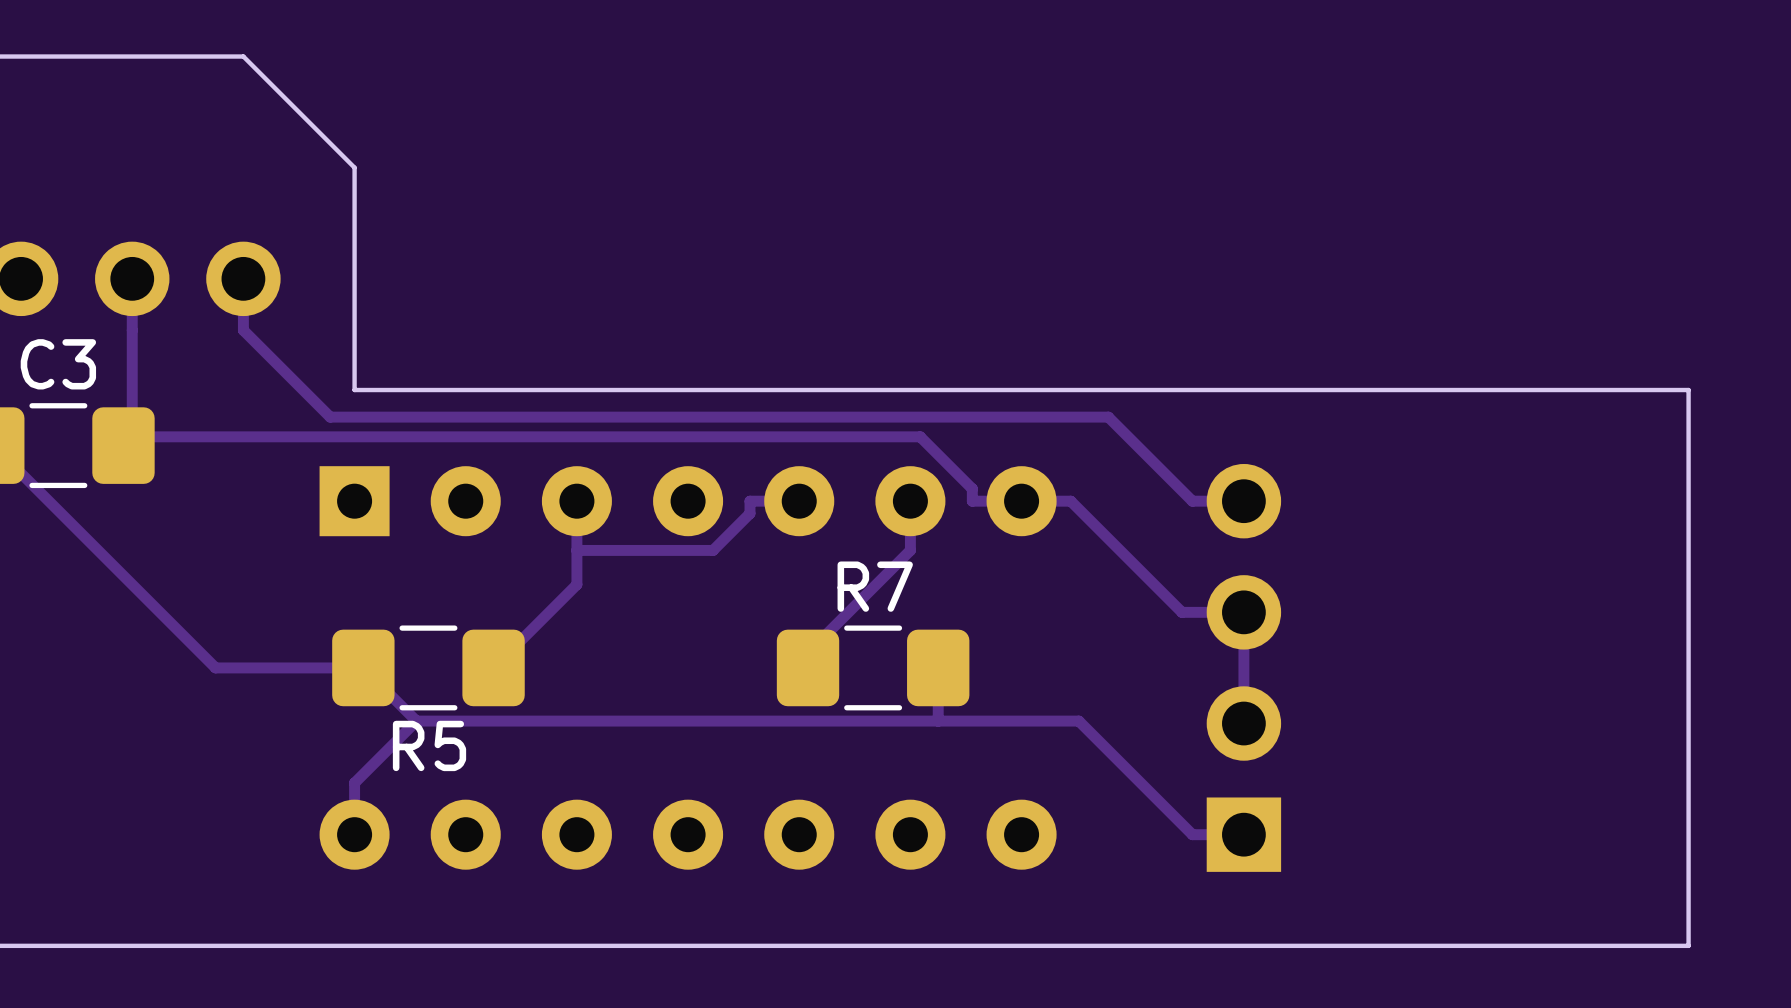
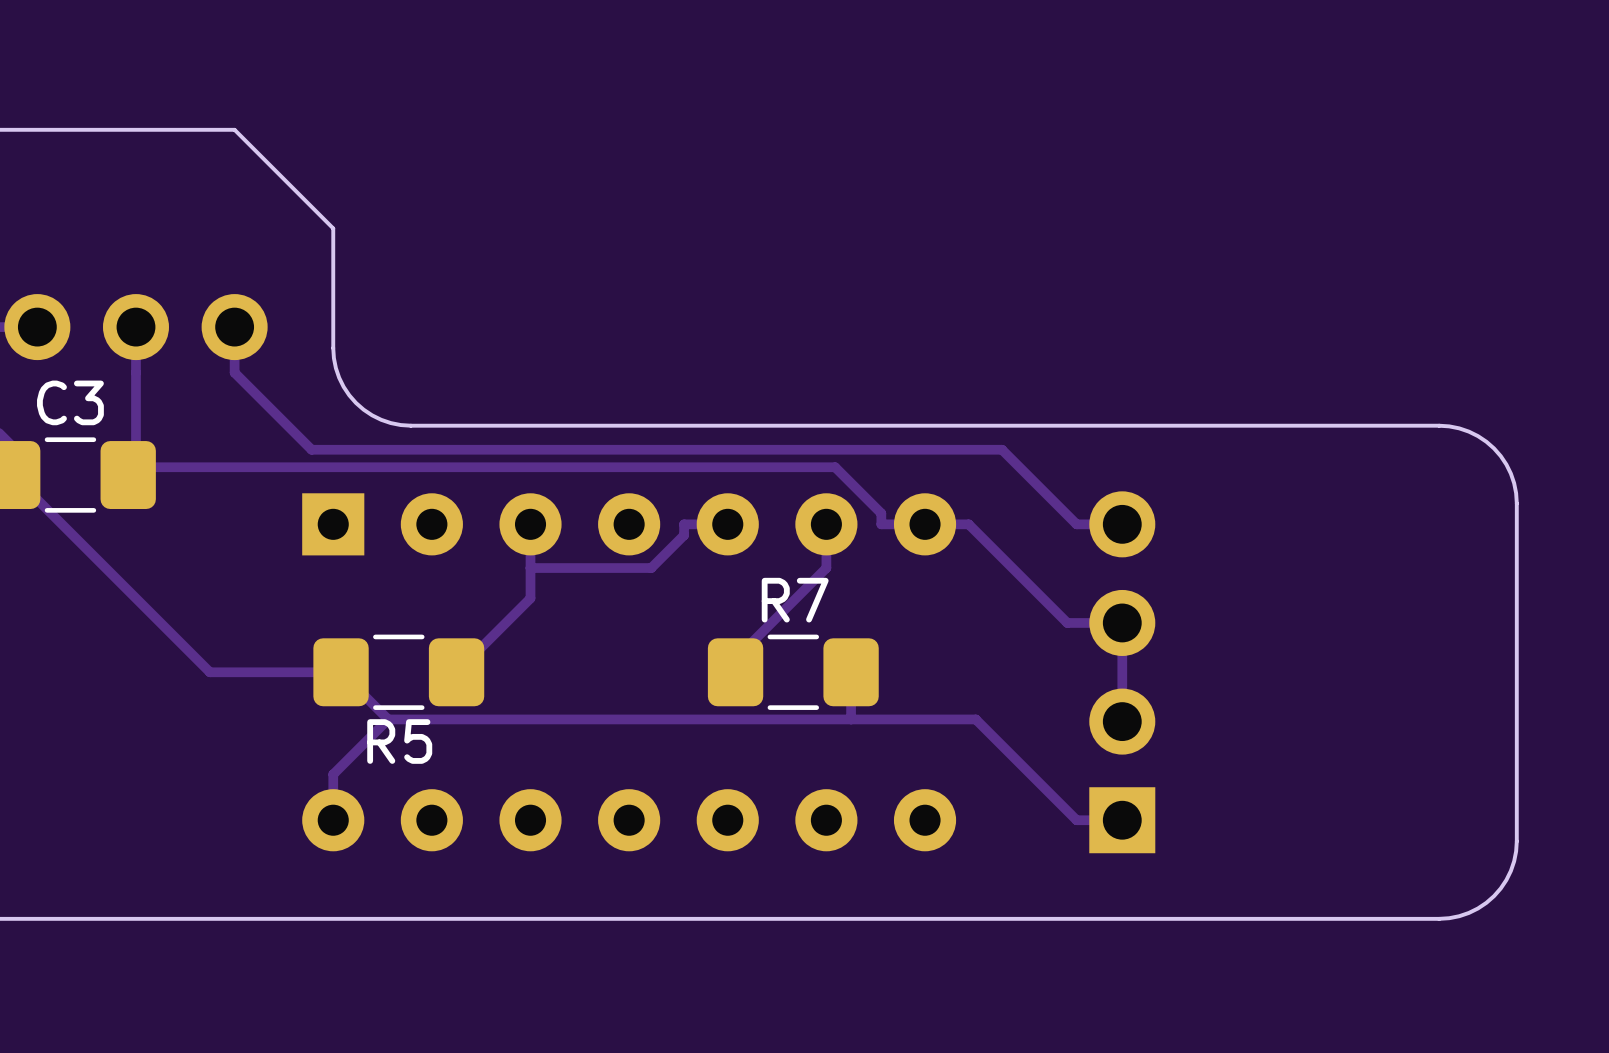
board edge: (354, 302) (354, 390) (442, 390) -> (333, 348) (339, 377) (356, 402) (381, 419) (410, 425)
board edge: (1601, 390) (1688, 390) (1688, 477) -> (1439, 425) (1468, 431) (1494, 448) (1510, 473) (1516, 503)
board edge: (1688, 858) (1688, 945) (1601, 945) -> (1516, 841) (1510, 870) (1494, 896) (1468, 912) (1439, 918)

